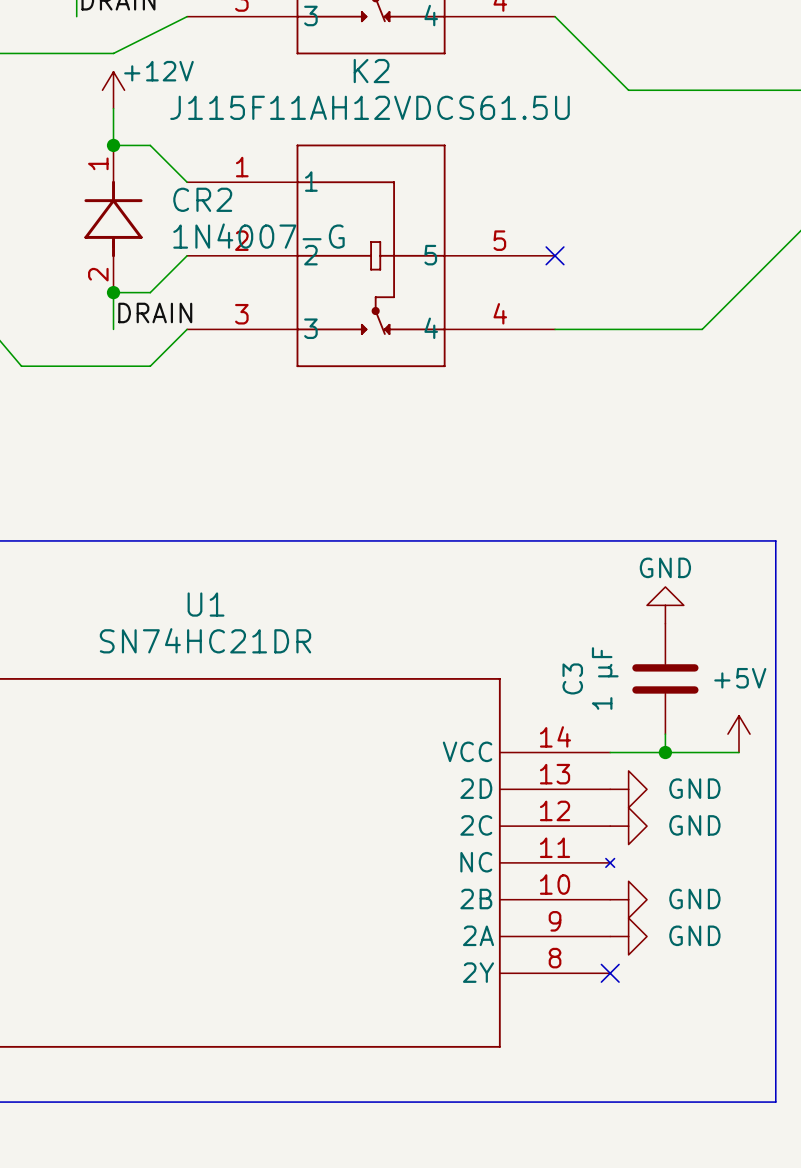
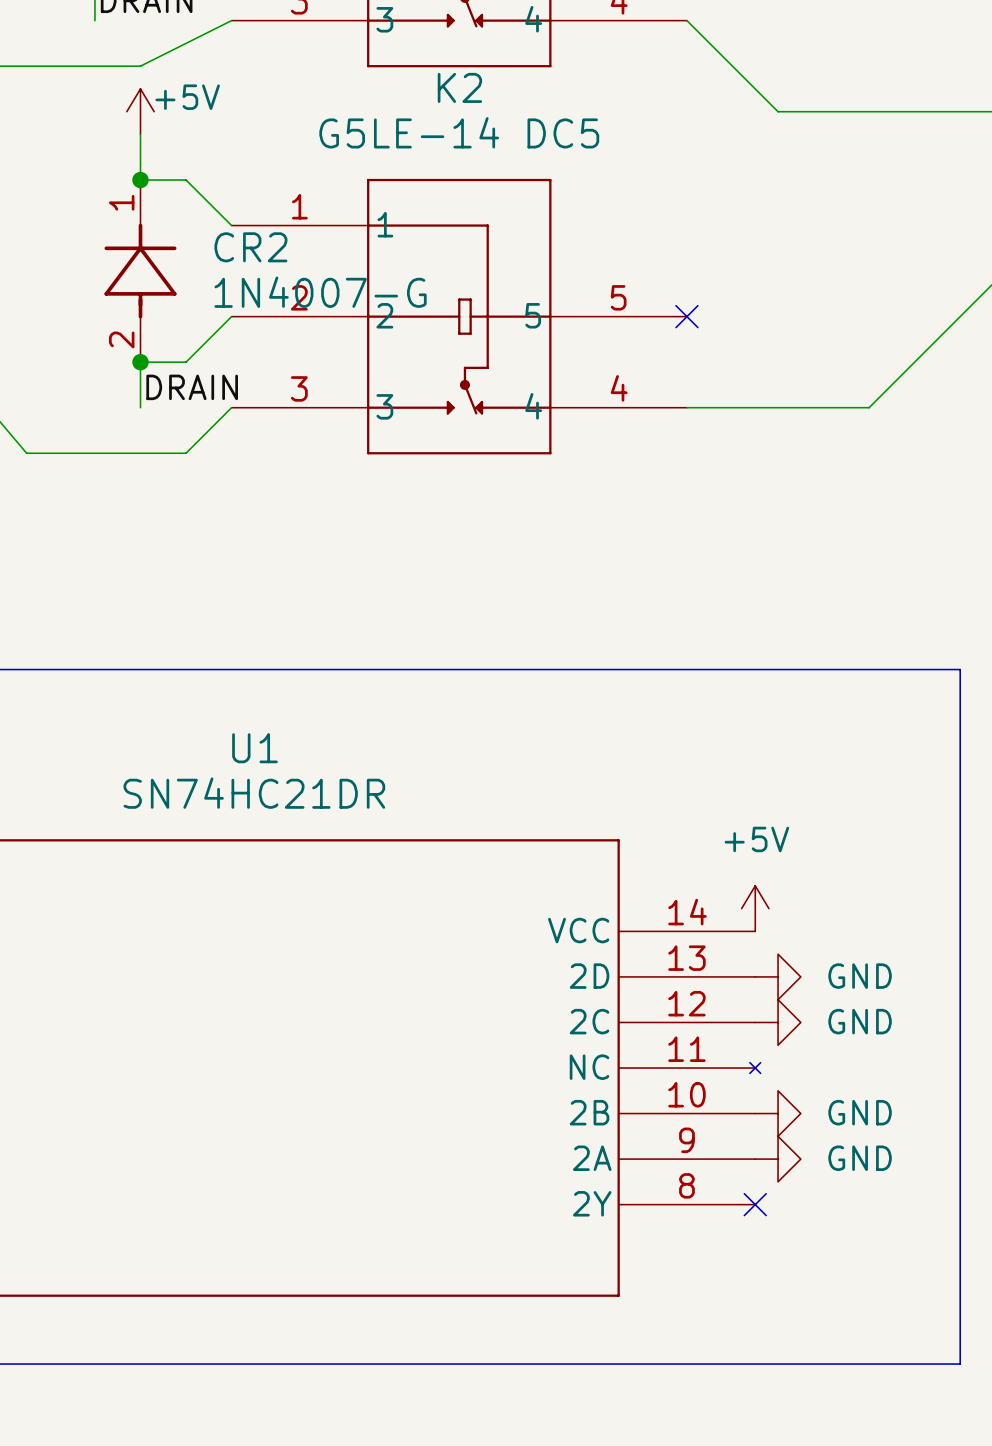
power symbol: +12V (113, 90) -> +5V (140, 111)
K2 value: J115F11AH12VDCS61.5U (370, 107) -> G5LE-14 DC5 (459, 132)
power symbol: GND (665, 605) -> none
C3: 1 µF (665, 678) -> none
wire: (665, 734) (665, 752) -> none
power symbol position: +5V (738, 734) -> +5V (755, 908)
wire: (610, 752) (738, 752) -> none
junction: (665, 752) -> none

